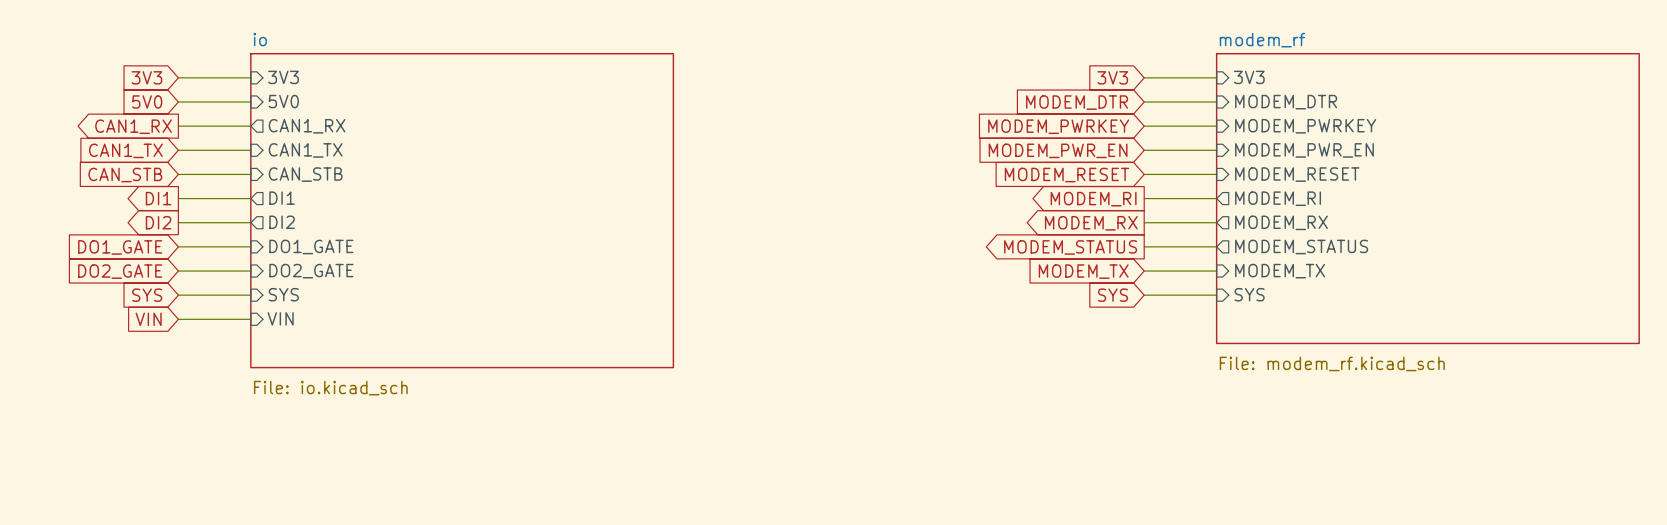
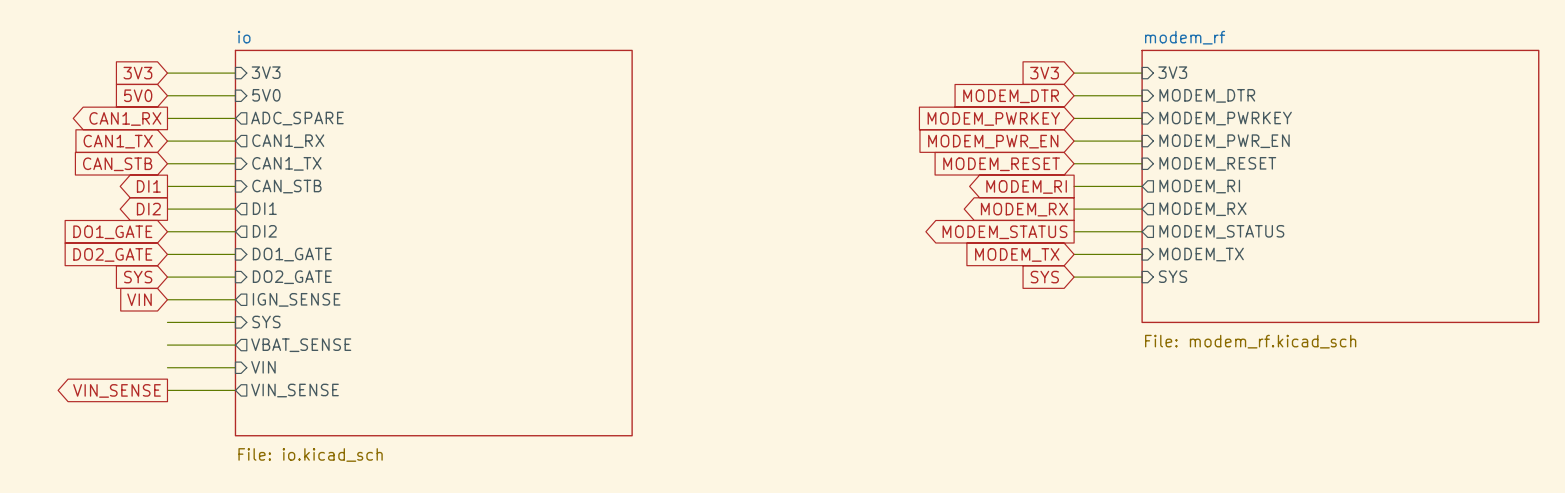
sheet pin: CAN1_RX (307, 126) -> ADC_SPARE (297, 118)
sheet pin shape: input (305, 150) -> output (288, 141)
sheet pin: CAN1_TX (305, 150) -> CAN1_RX (288, 141)
sheet pin: CAN_STB (305, 174) -> CAN1_TX (286, 163)
sheet pin shape: output (282, 198) -> input (286, 186)
sheet pin: DI1 (282, 198) -> CAN_STB (286, 186)
sheet io: File: io.kicad_sch (462, 210) -> none
sheet pin: DI2 (282, 222) -> DI1 (264, 208)
sheet pin shape: input (311, 246) -> output (264, 231)
sheet pin: DO1_GATE (311, 246) -> DI2 (264, 231)
sheet io: none -> File: io.kicad_sch (433, 243)
sheet pin: DO2_GATE (311, 271) -> DO1_GATE (292, 254)
sheet pin: SYS (283, 294) -> DO2_GATE (292, 277)
sheet pin shape: input (280, 318) -> output (296, 299)
sheet pin: VIN (280, 318) -> IGN_SENSE (296, 299)
wire: none -> (167, 322) (235, 322)
sheet pin: none -> SYS (266, 321)
wire: none -> (167, 345) (235, 345)
sheet pin: none -> VBAT_SENSE (301, 345)
wire: none -> (167, 367) (235, 367)
sheet pin: none -> VIN (263, 367)
wire: none -> (167, 390) (235, 390)
global label: none -> VIN_SENSE (117, 390)
sheet pin: none -> VIN_SENSE (295, 390)

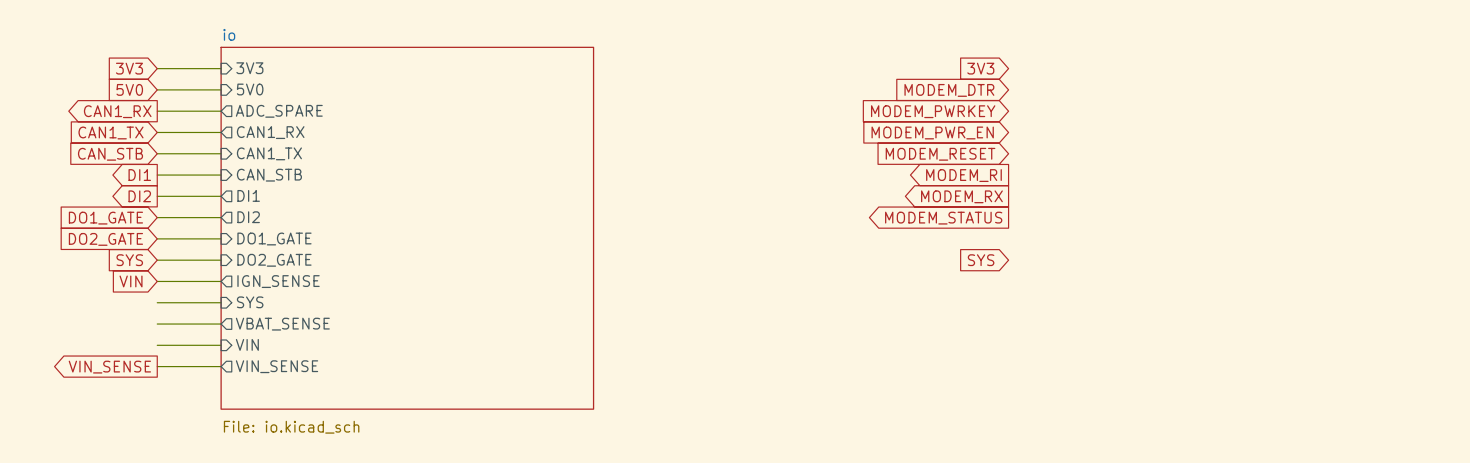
sheet pin: 3V3 (1172, 72) -> none
wire: (1074, 73) (1142, 73) -> none
wire: (1074, 95) (1142, 95) -> none
sheet pin: MODEM_DTR (1207, 95) -> none
wire: (1074, 118) (1142, 118) -> none
sheet pin: MODEM_PWRKEY (1225, 118) -> none
wire: (1074, 141) (1142, 141) -> none
sheet pin: MODEM_PWR_EN (1224, 141) -> none
wire: (1074, 163) (1142, 163) -> none
sheet pin: MODEM_RESET (1217, 163) -> none
wire: (1074, 186) (1142, 186) -> none
sheet pin: MODEM_RI (1199, 186) -> none
sheet modem_rf: File: modem_rf.kicad_sch (1340, 186) -> none
wire: (1074, 209) (1142, 209) -> none
sheet pin: MODEM_RX (1202, 209) -> none
wire: (1074, 231) (1142, 231) -> none
sheet pin: MODEM_STATUS (1221, 231) -> none
global label: MODEM_TX (1017, 254) -> none
wire: (1074, 254) (1142, 254) -> none
sheet pin: MODEM_TX (1201, 254) -> none
sheet pin: SYS (1173, 276) -> none
wire: (1074, 277) (1142, 277) -> none

